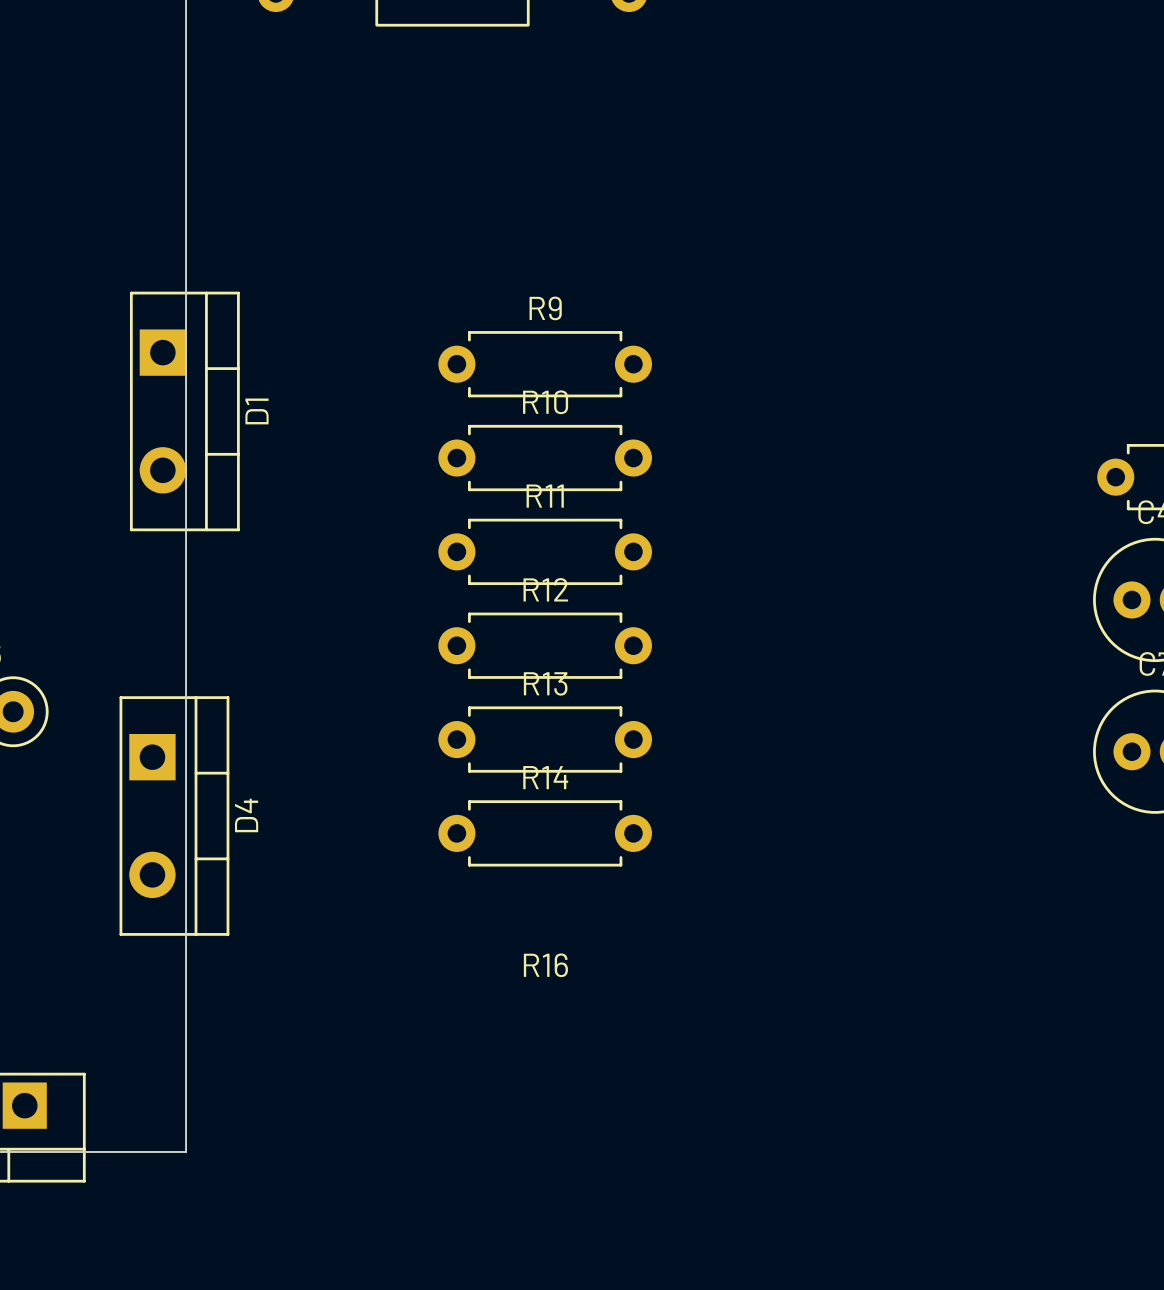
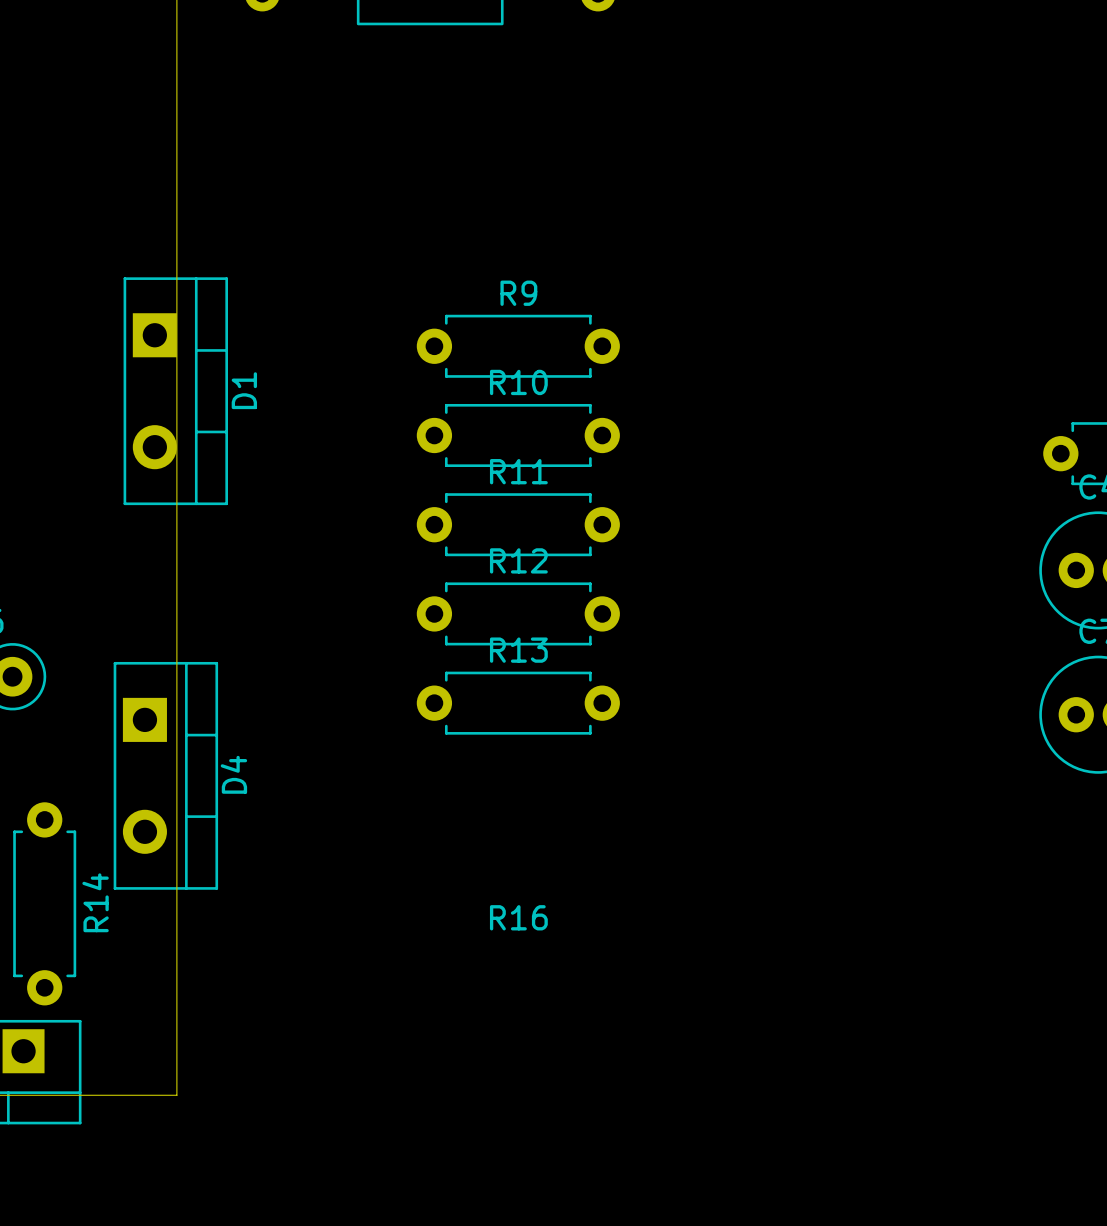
R14 rotation: 0° (545, 833) -> 90° clockwise (44, 903)
R14 position: (545, 833) -> (44, 903)

